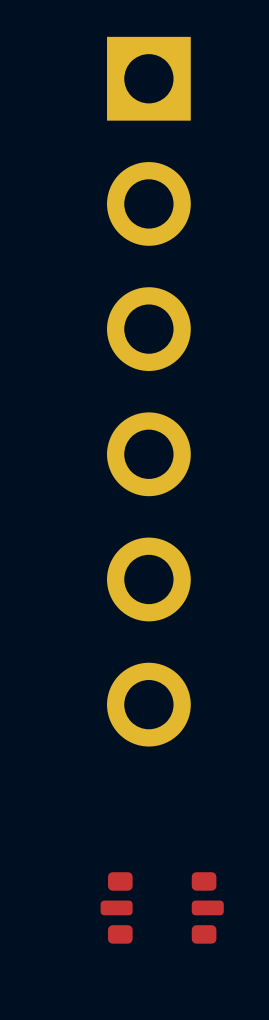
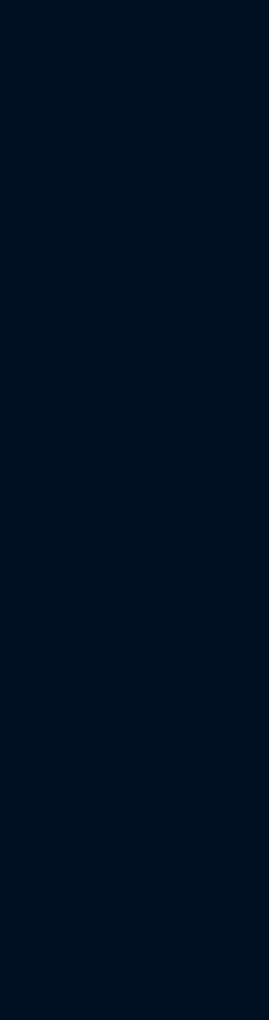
part: (148, 391) -> none
part: (162, 907) -> none

